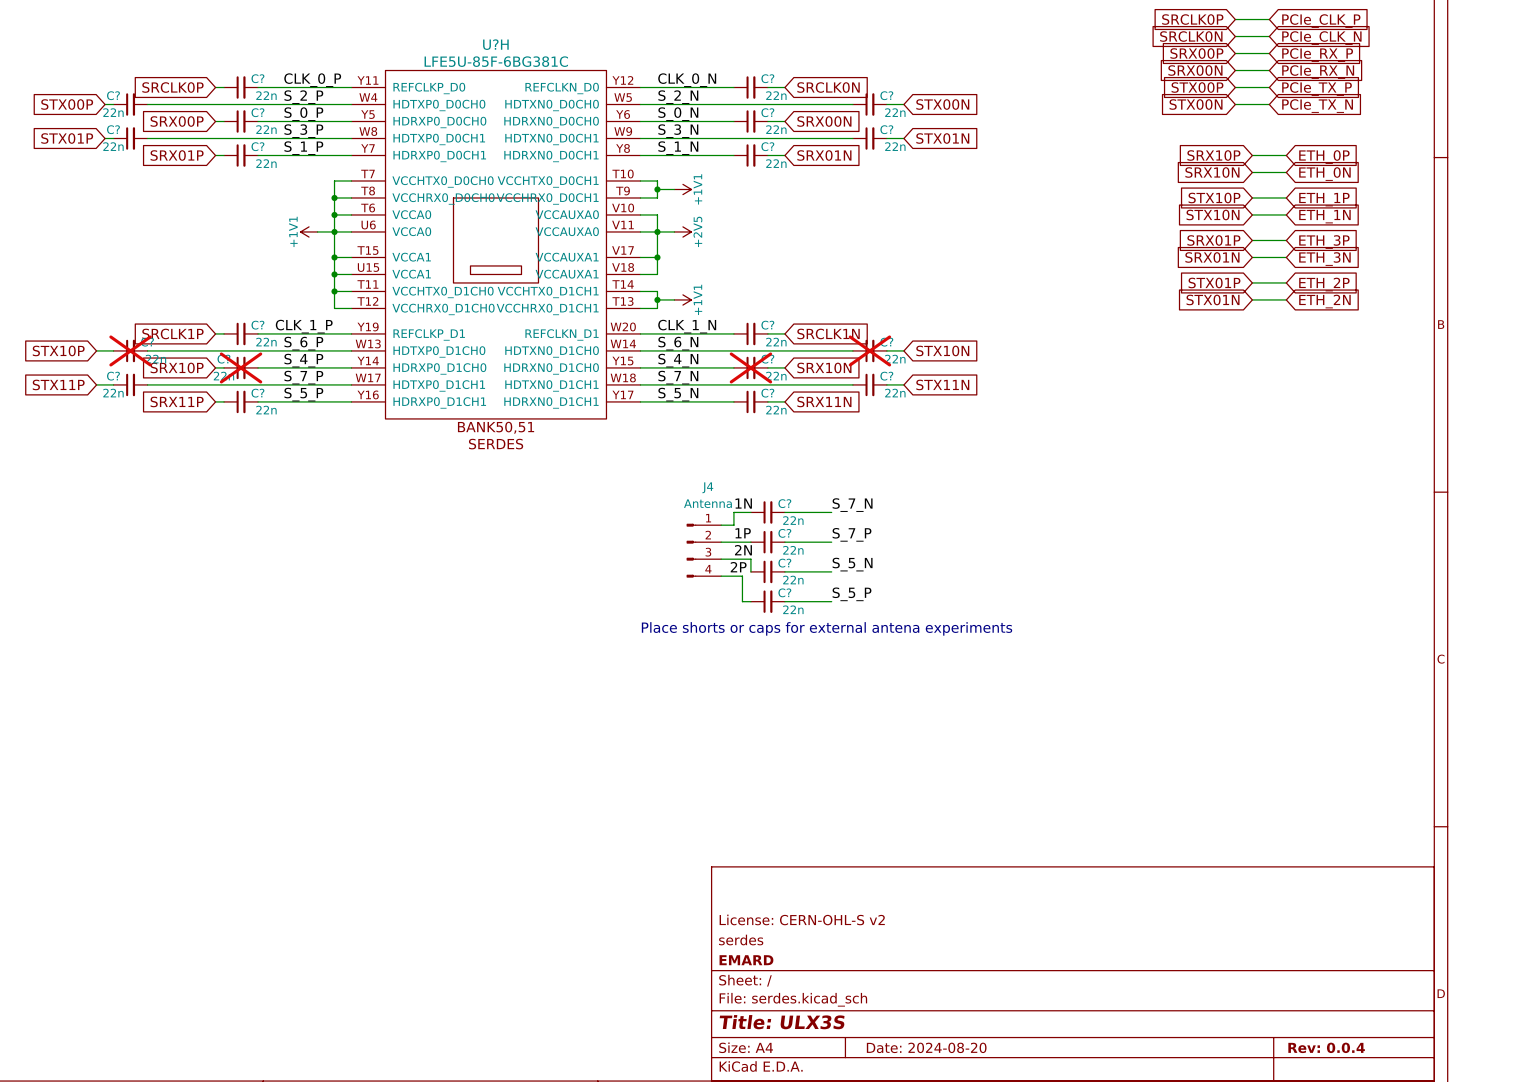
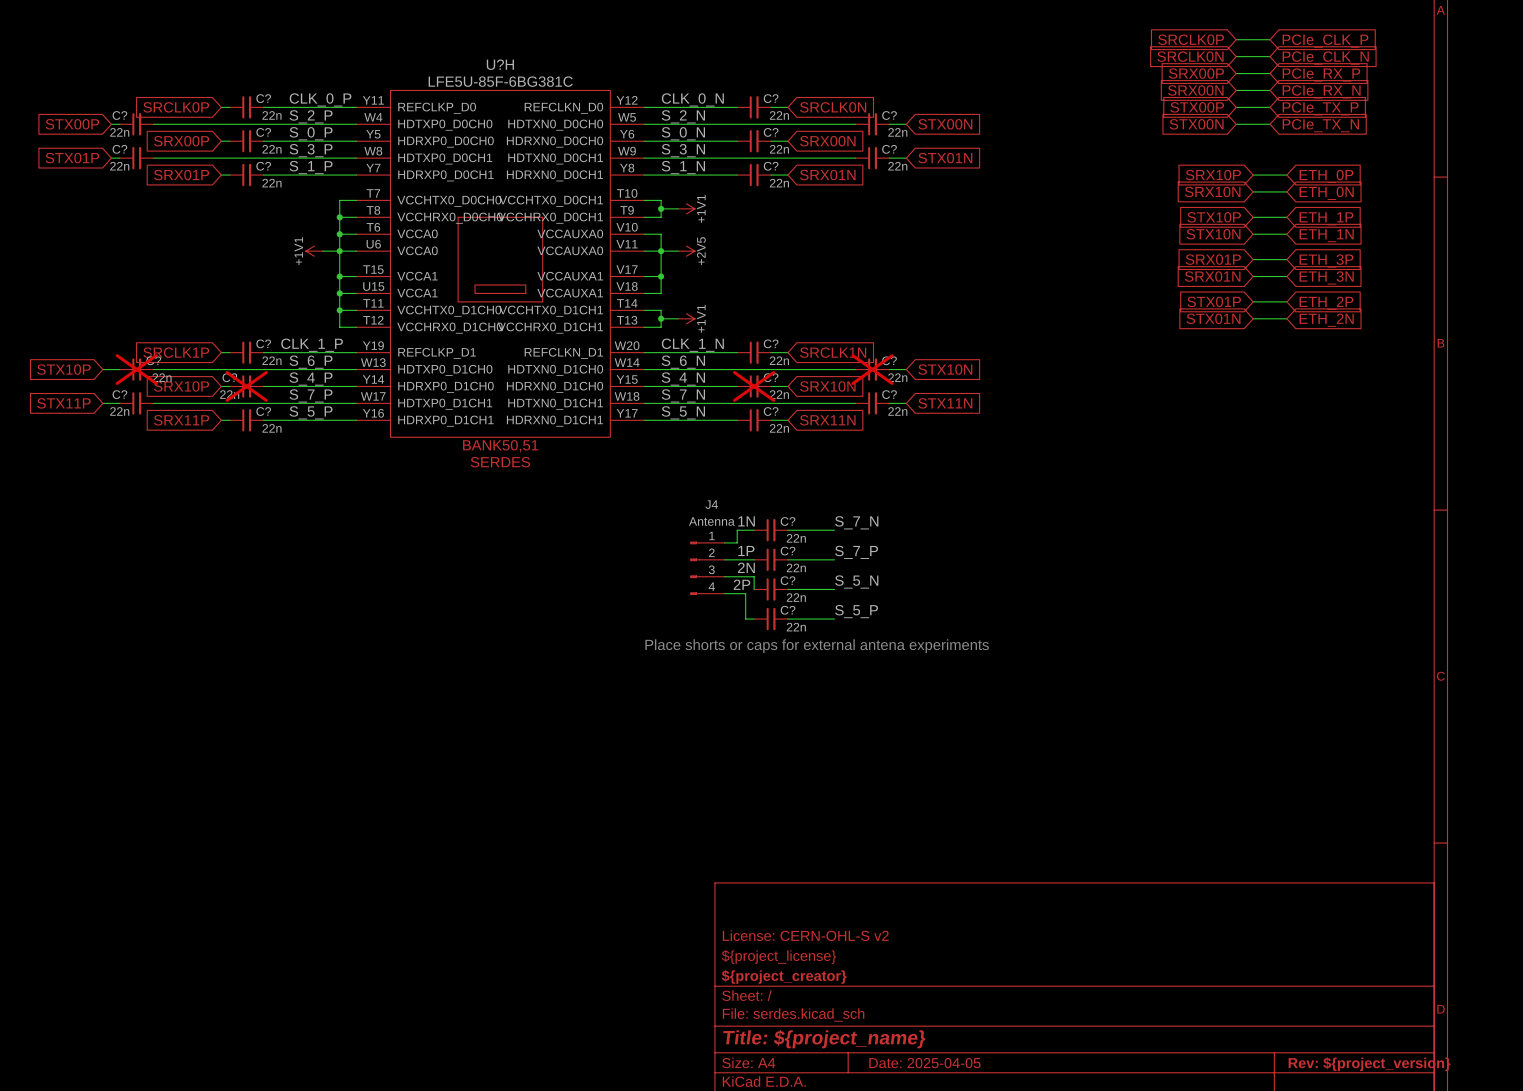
title block: serdes (741, 940) -> ${project_license} (778, 956)
title block: EMARD (746, 960) -> ${project_creator} (784, 976)
title block: Title: ULX3S (782, 1022) -> Title: ${project_name} (824, 1039)
title block: Date: 2024-08-20 (926, 1047) -> Date: 2025-04-05 (924, 1063)
title block: Rev: 0.0.4 (1326, 1047) -> Rev: ${project_version} (1369, 1064)

